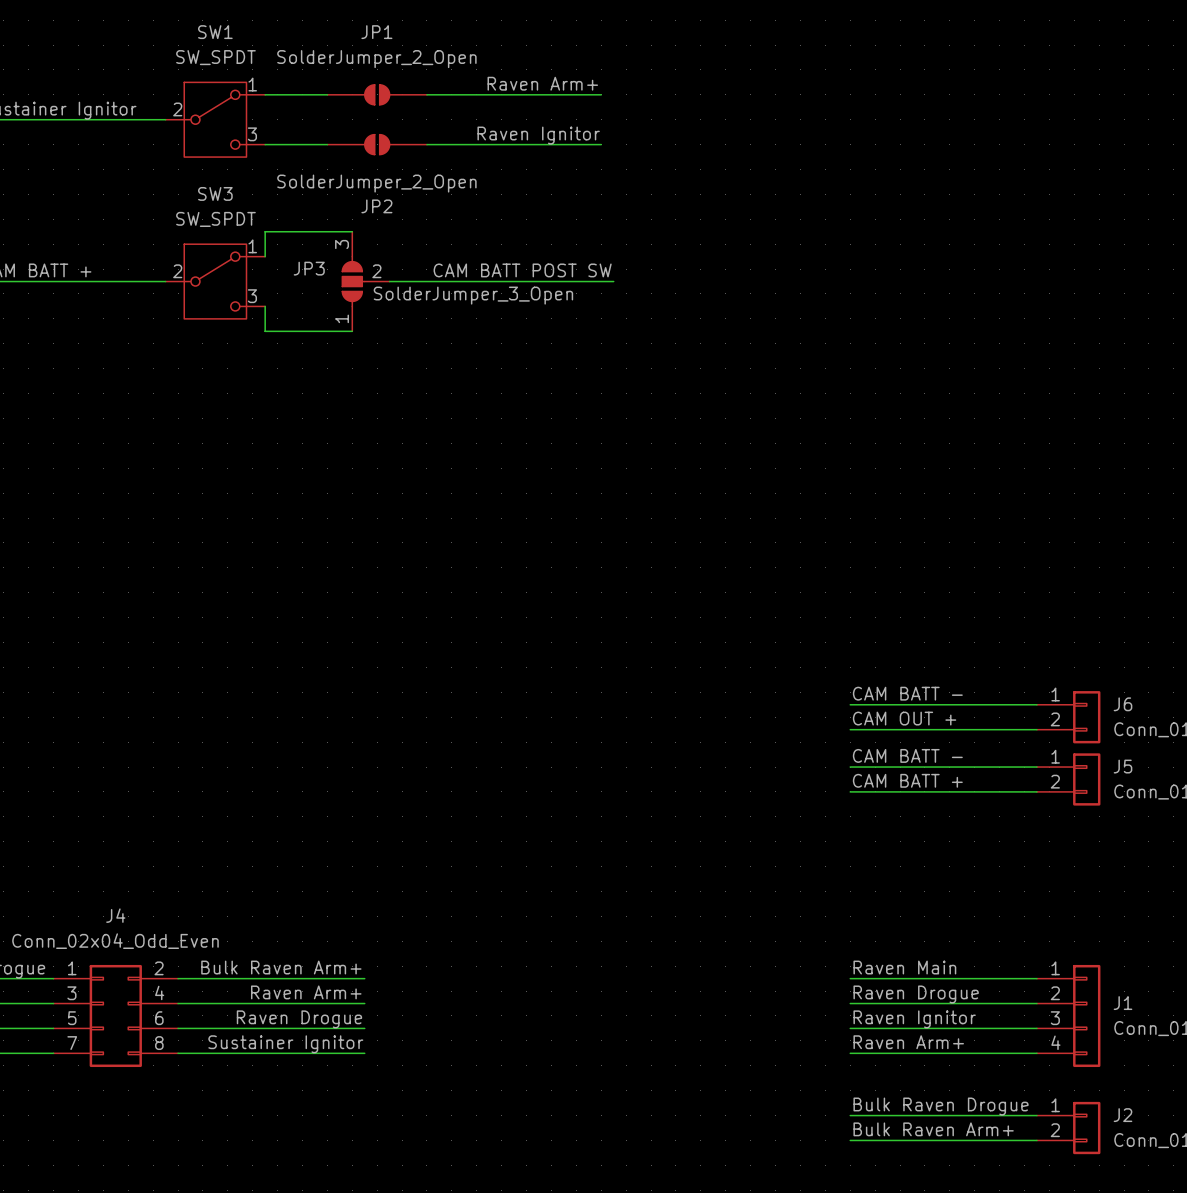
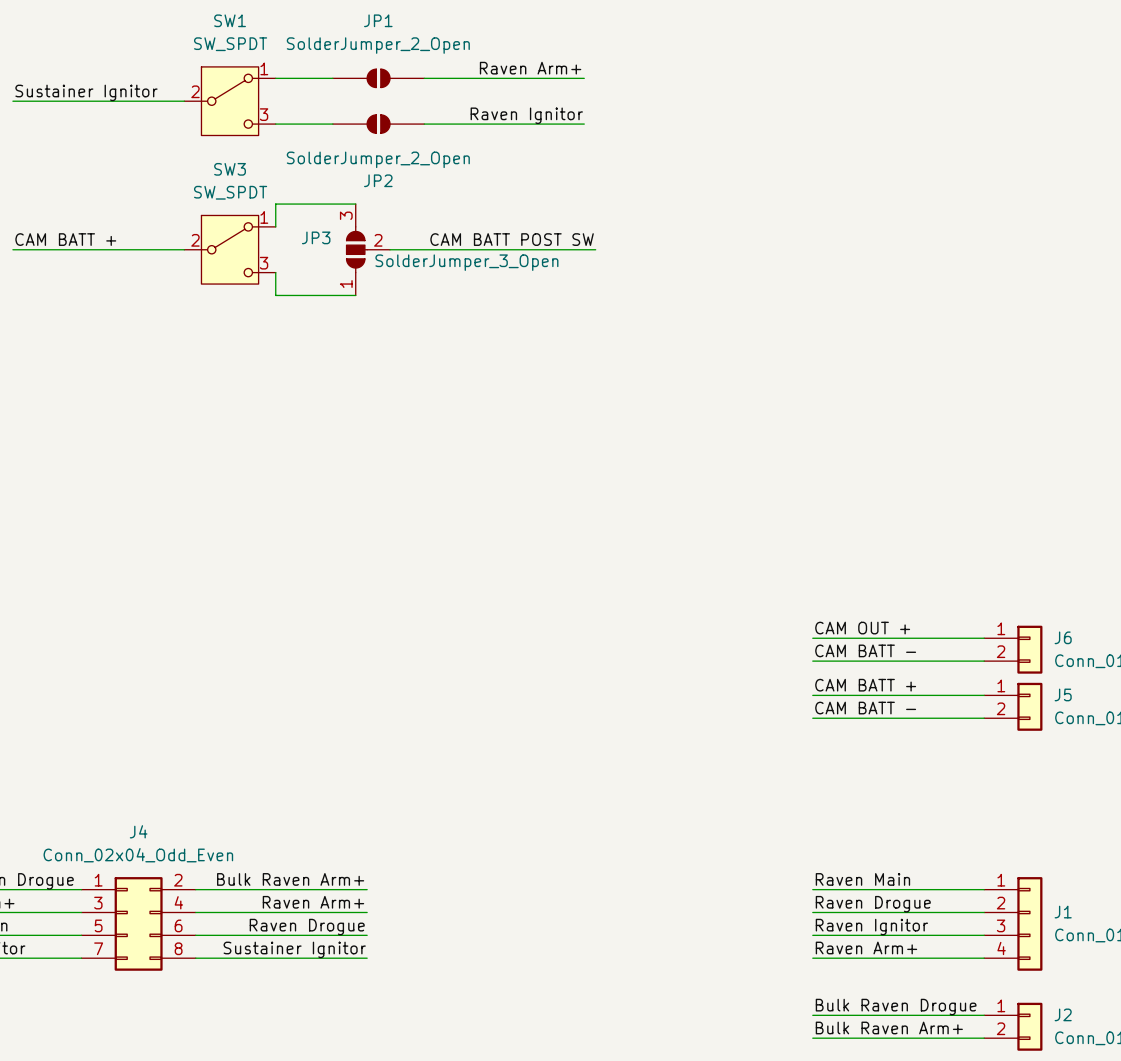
label: CAM BATT - (907, 693) -> CAM OUT + (862, 628)
label: CAM OUT + (904, 718) -> CAM BATT - (865, 650)
label: CAM BATT - (907, 755) -> CAM BATT + (865, 685)
label: CAM BATT + (907, 780) -> CAM BATT - (865, 708)

